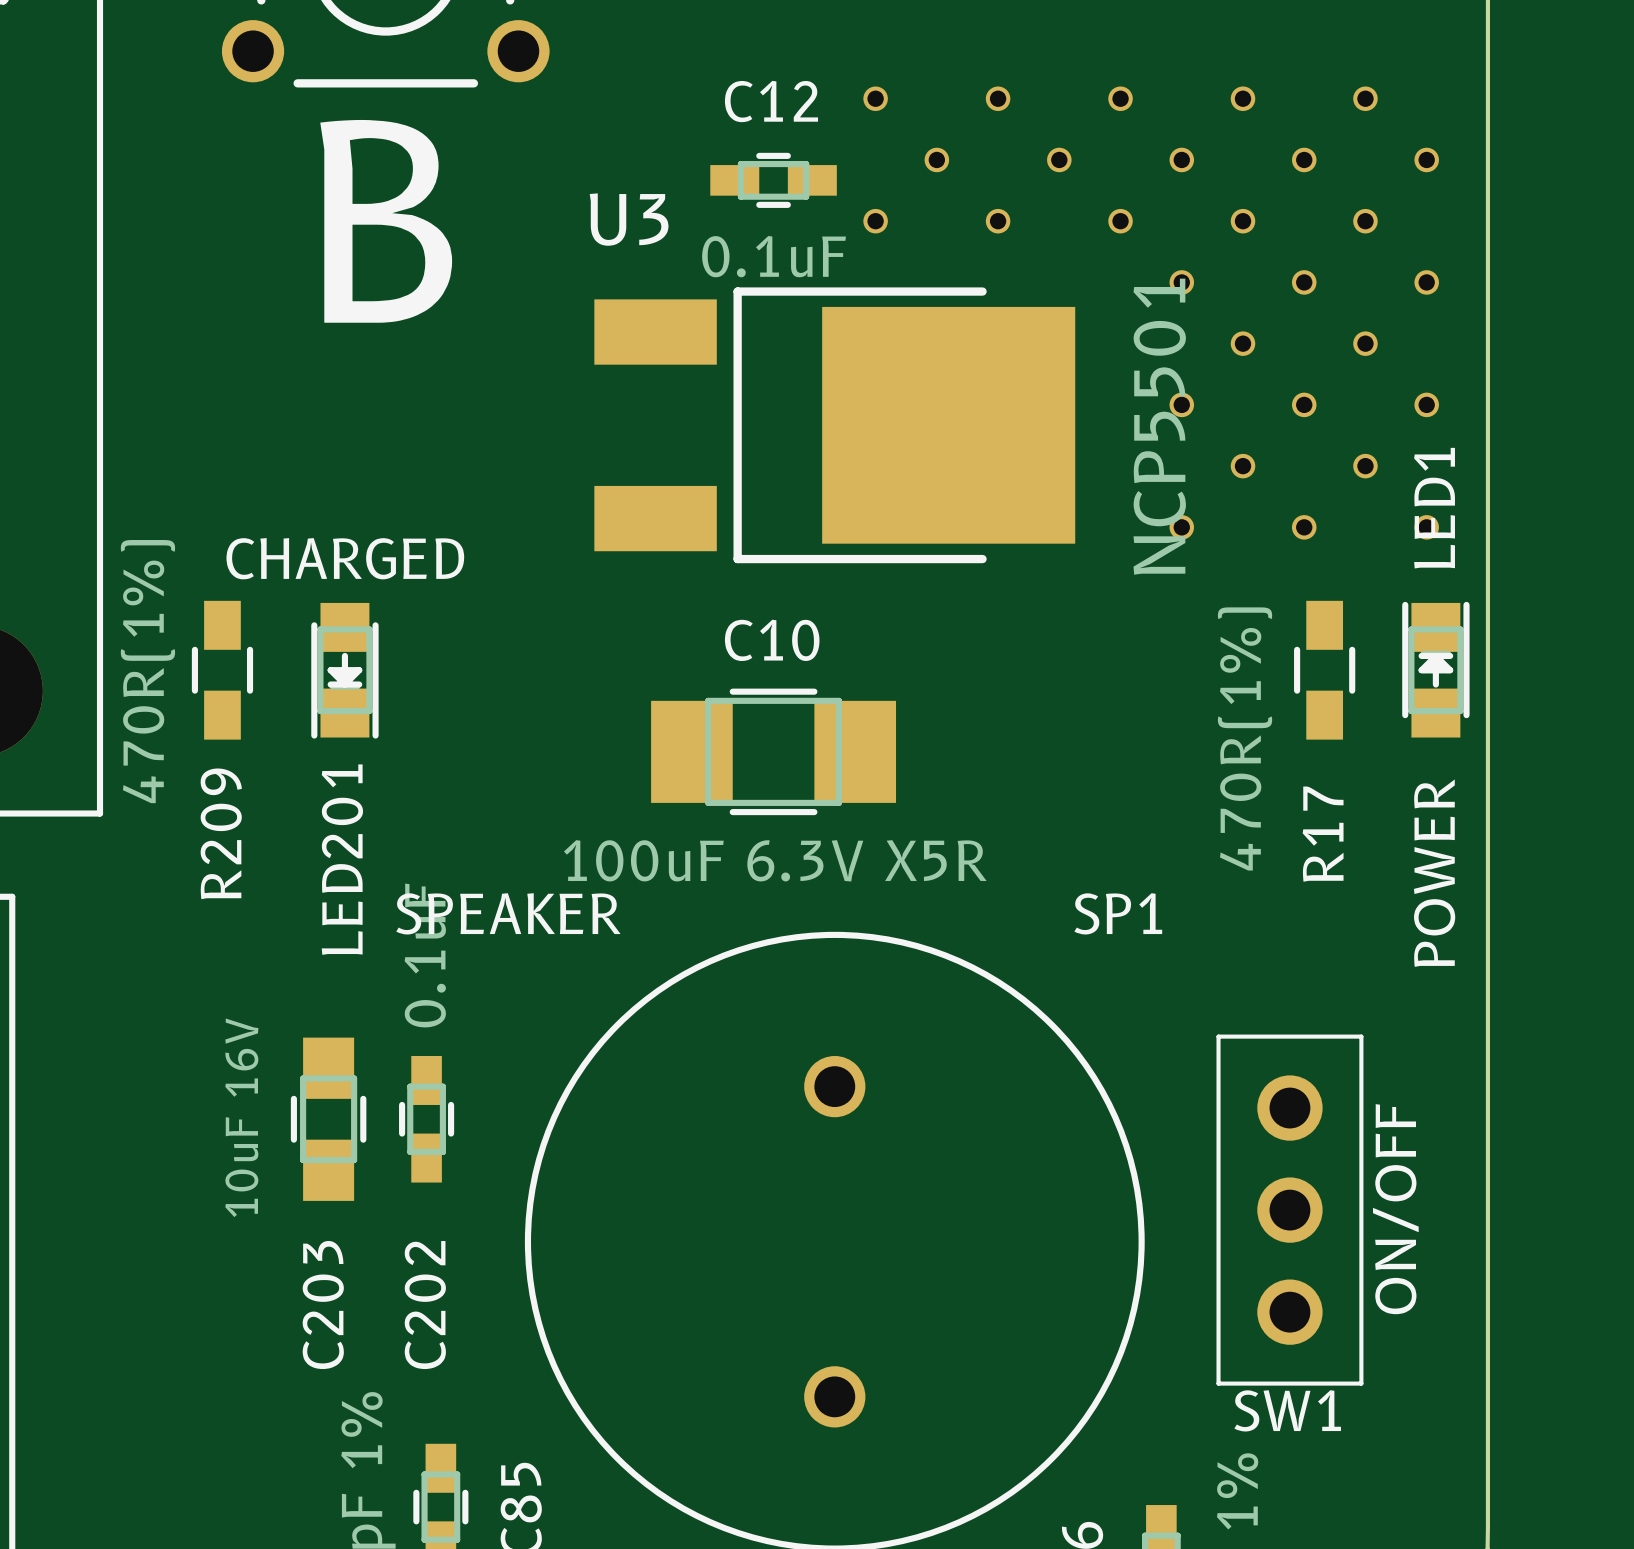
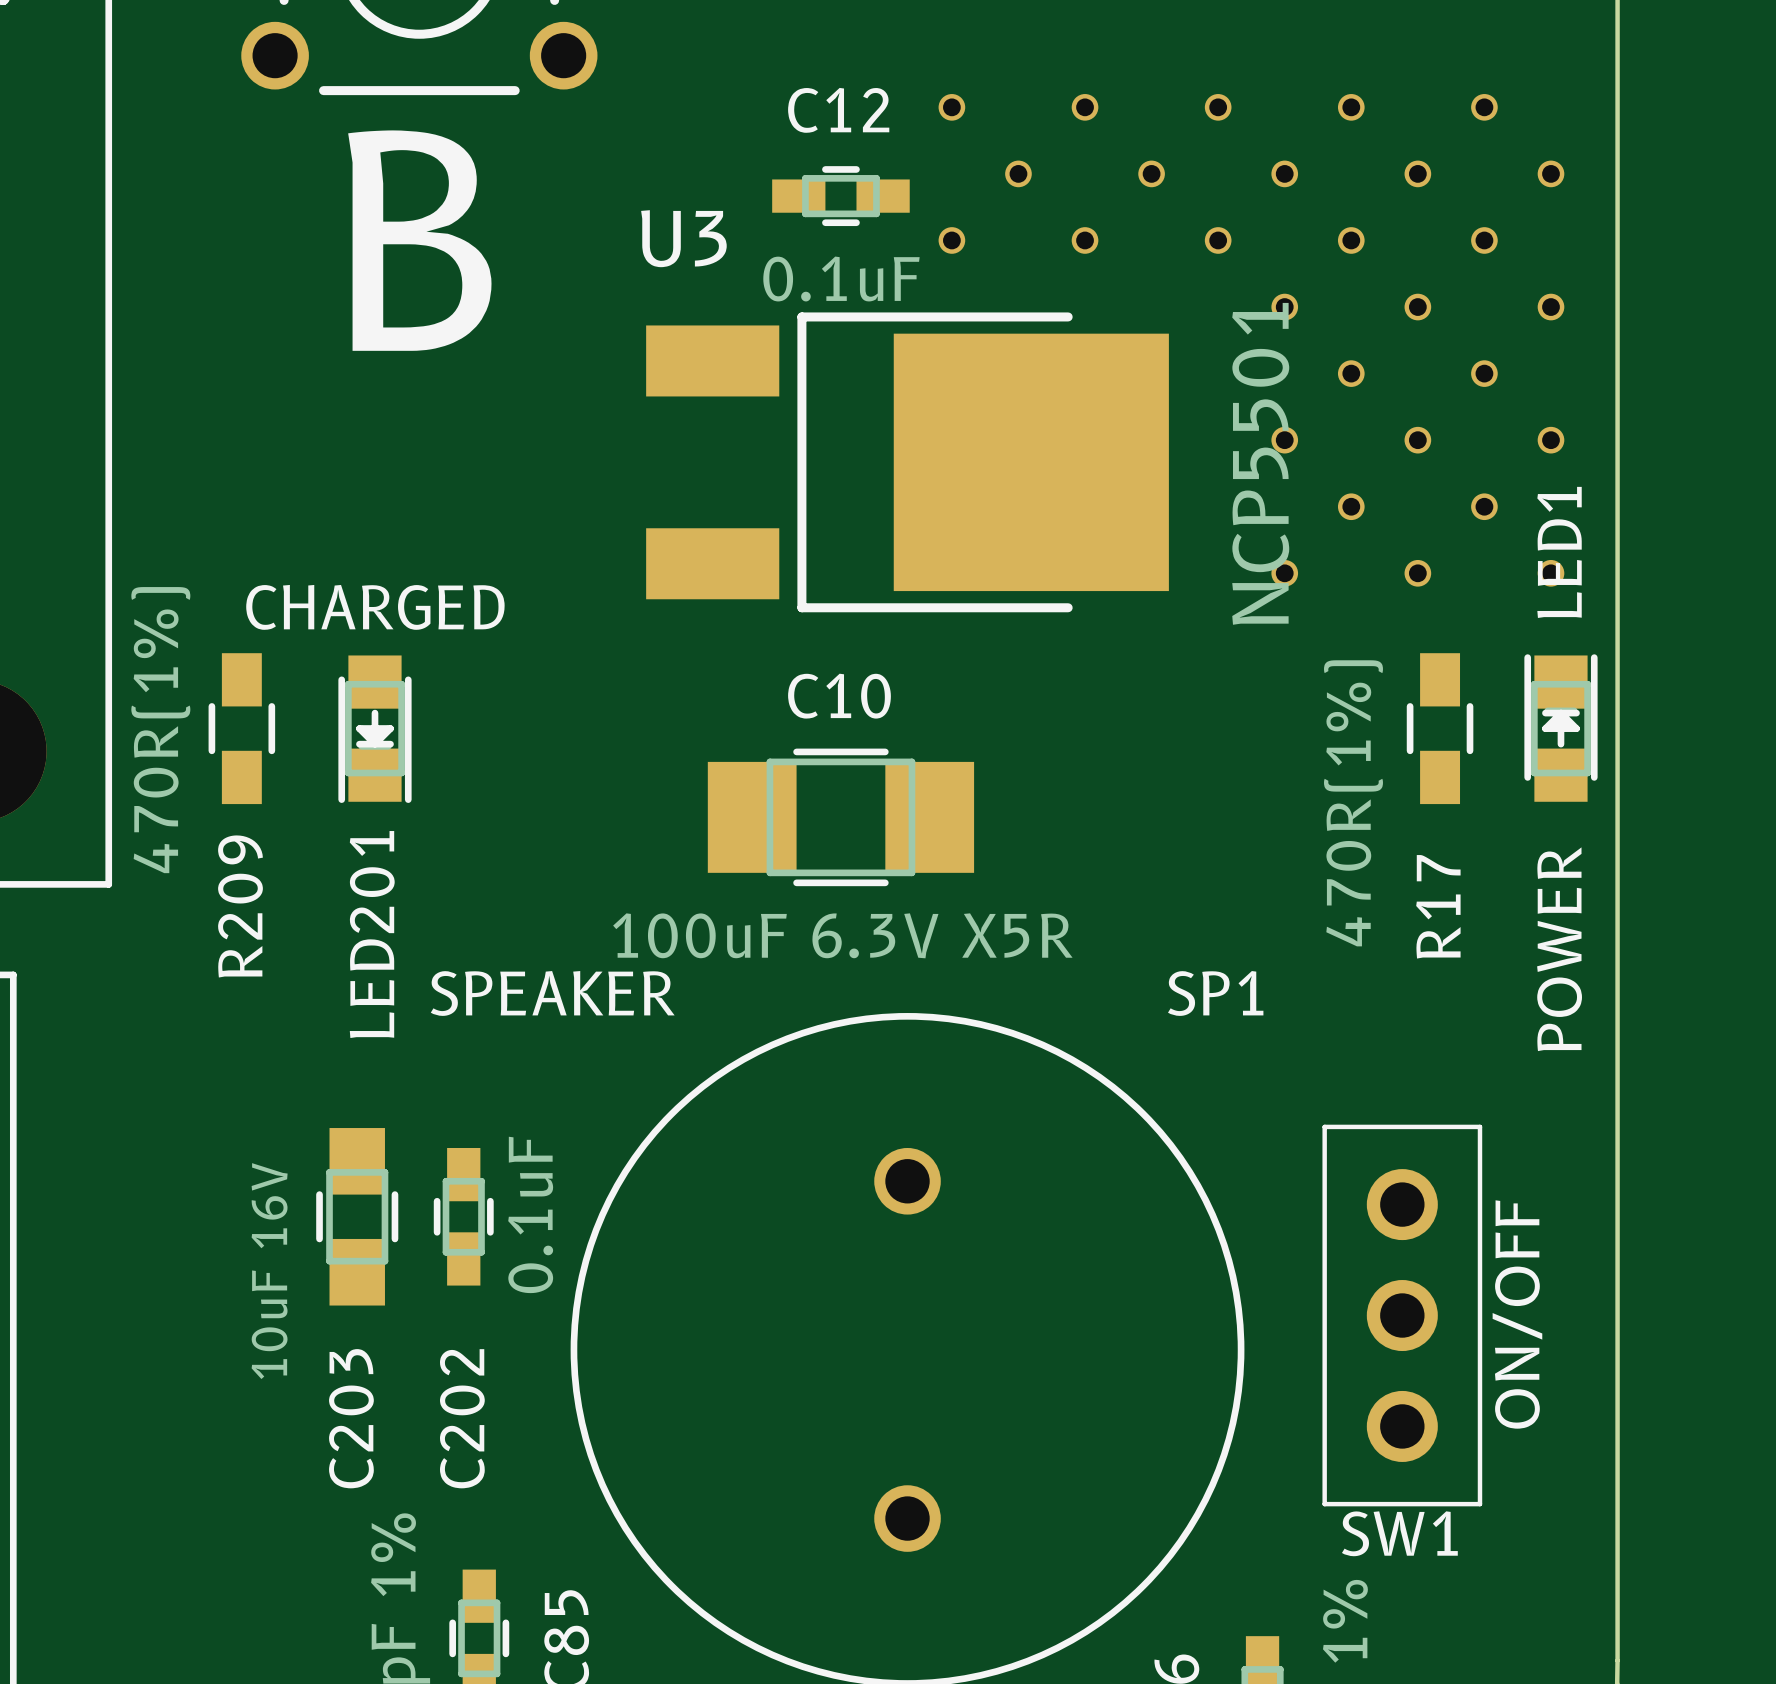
C202 value position: 0.1uF (425, 955) -> 0.1uF (530, 1214)
C203 value position: 10uF 16V (241, 1117) -> 10uF 16V (269, 1271)

